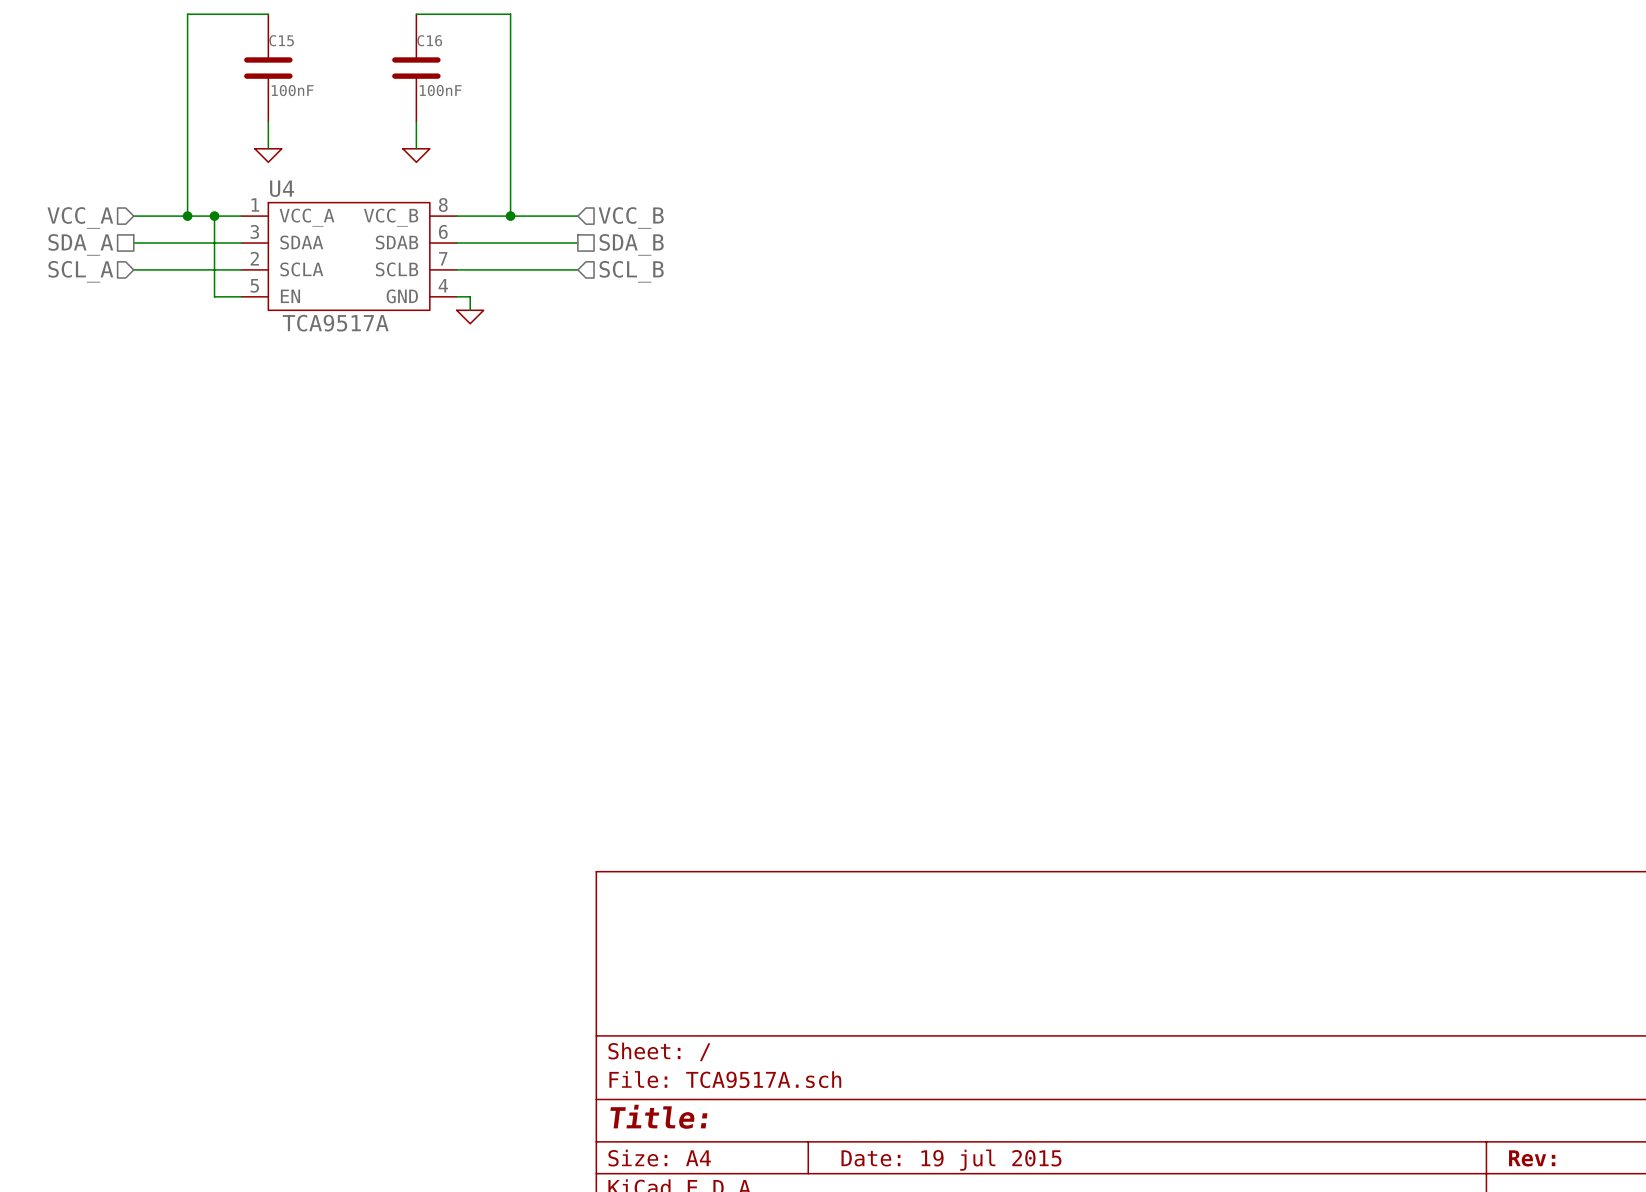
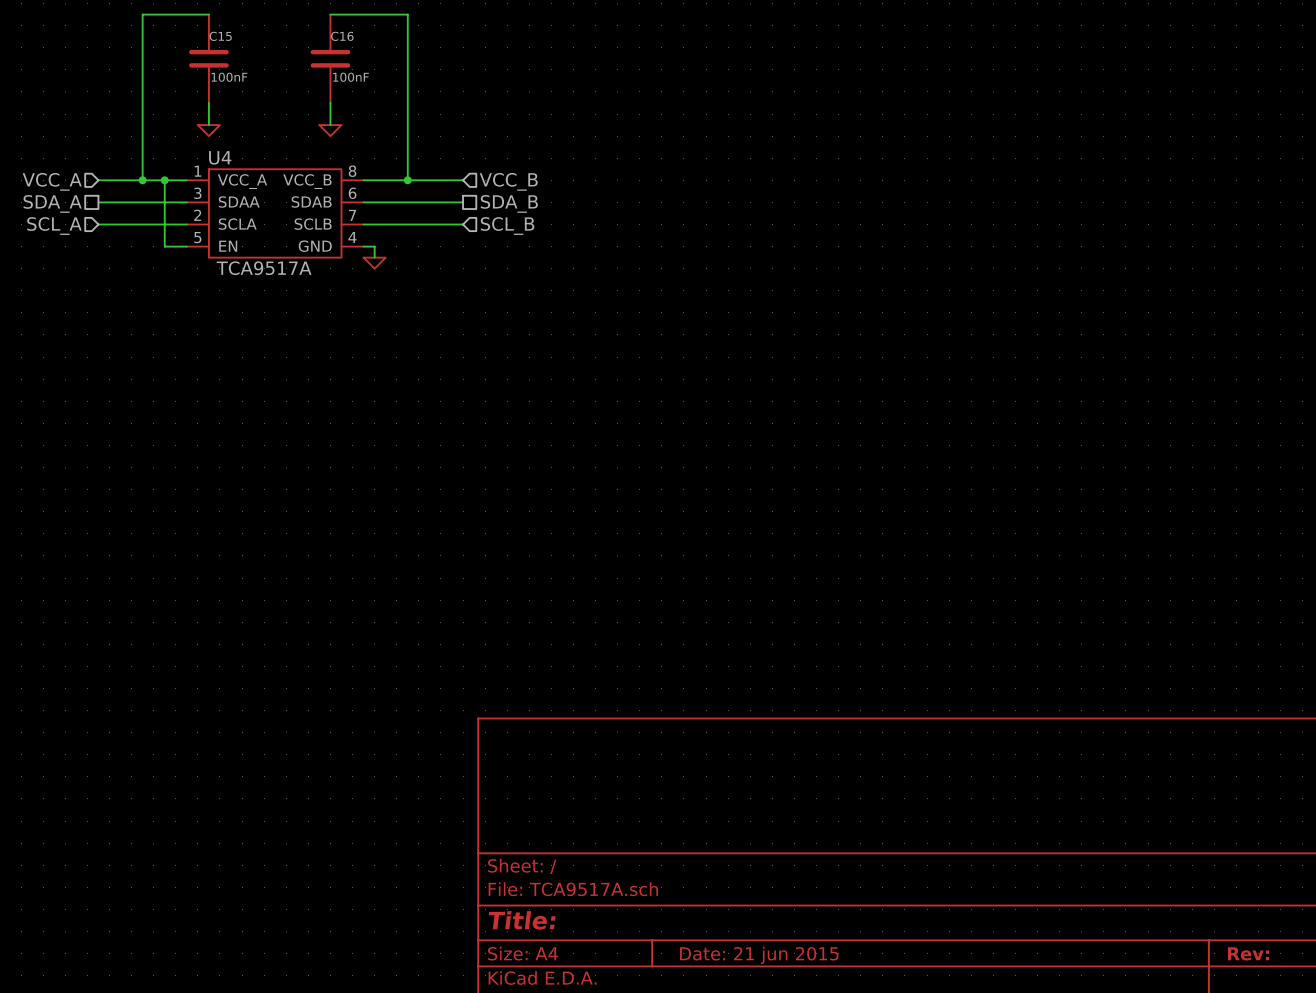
title block: Date: 19 jul 2015 (951, 1160) -> Date: 21 jun 2015 (759, 955)

